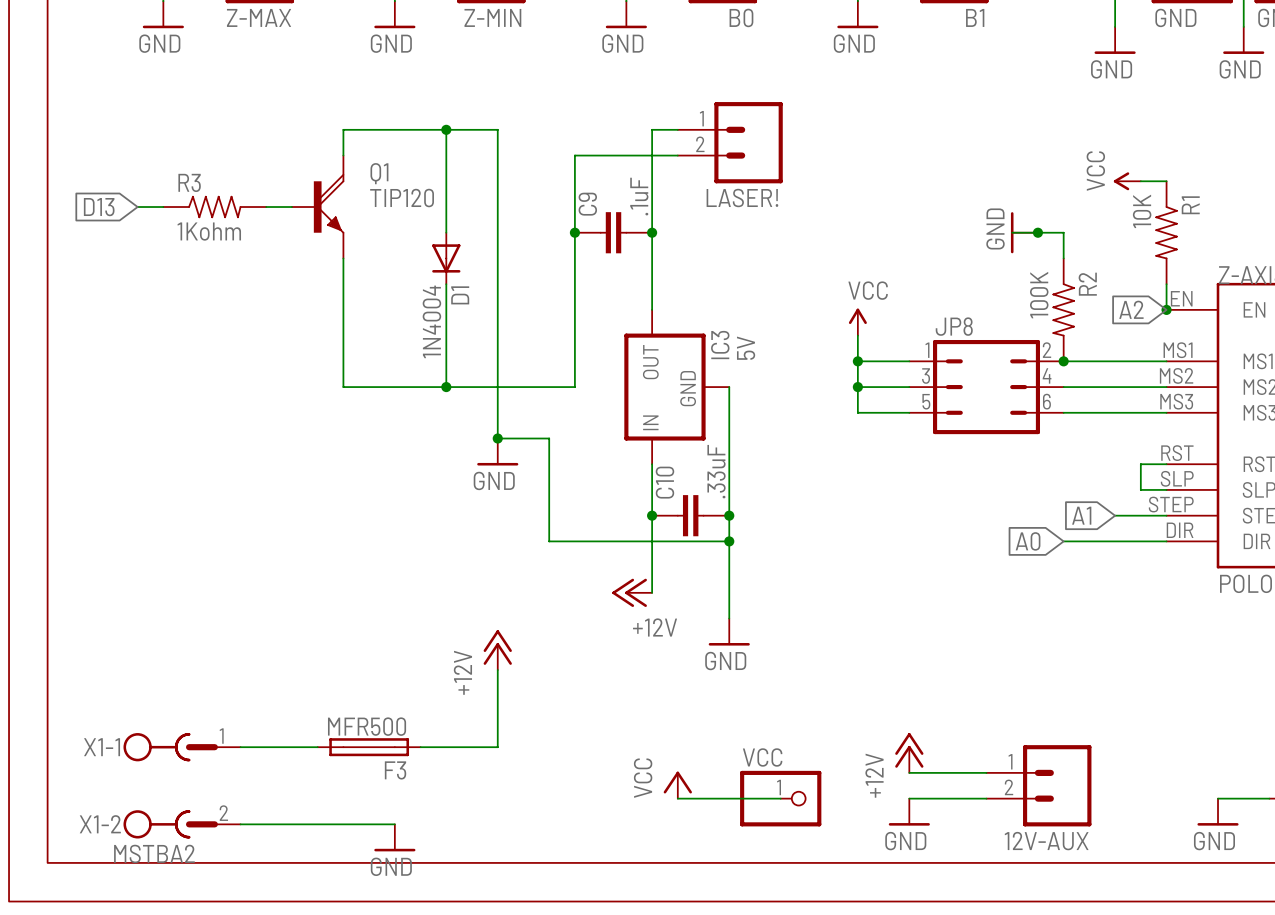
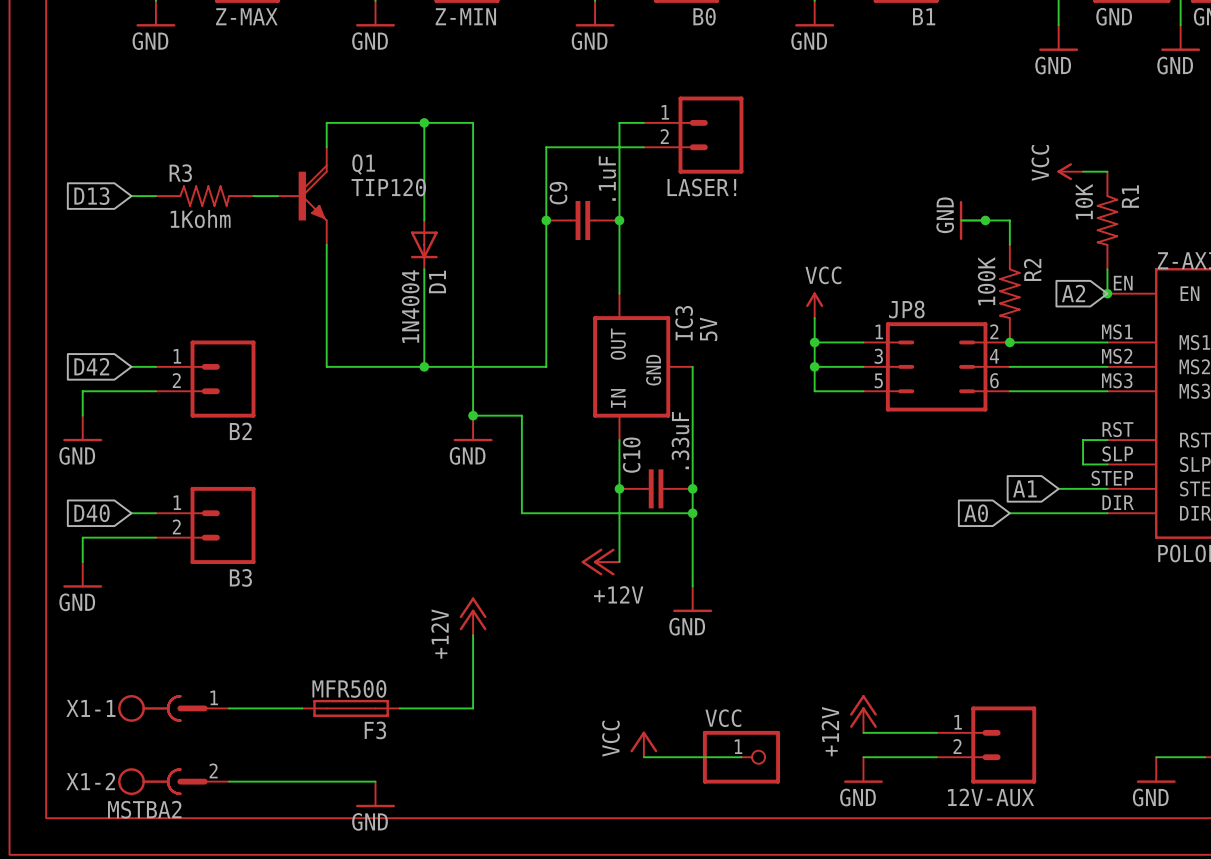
global label: none -> D42 (91, 366)
wire: none -> (131, 366) (155, 366)
B2: none -> (205, 379)
wire: none -> (155, 391) (82, 391) (82, 415)
power symbol: none -> GND (82, 428)
global label: none -> D40 (92, 513)
wire: none -> (131, 513) (155, 513)
B3: none -> (205, 525)
wire: none -> (155, 537) (82, 537) (82, 562)
power symbol: none -> GND (82, 574)

